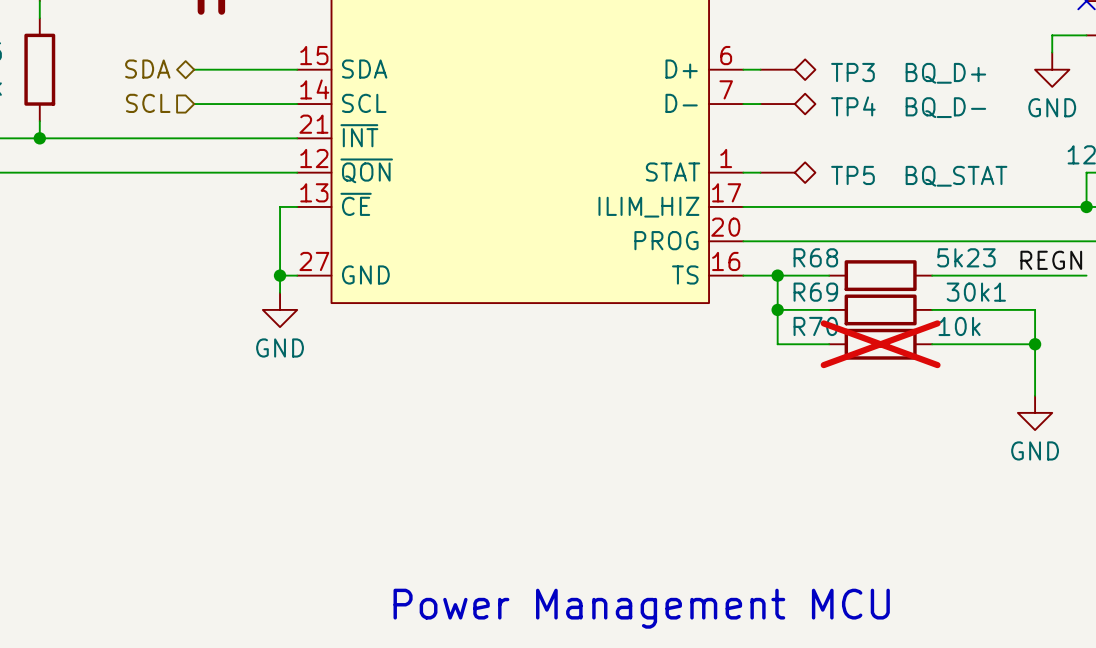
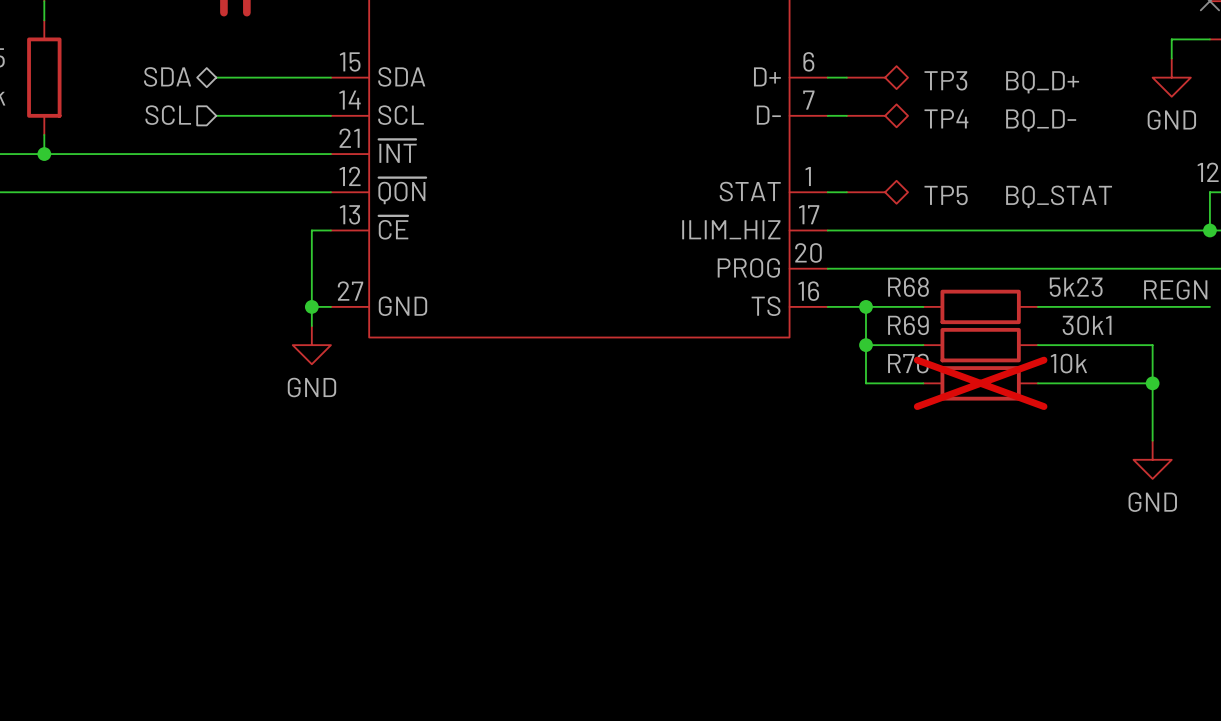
text: Power Management MCU (641, 608) -> none

